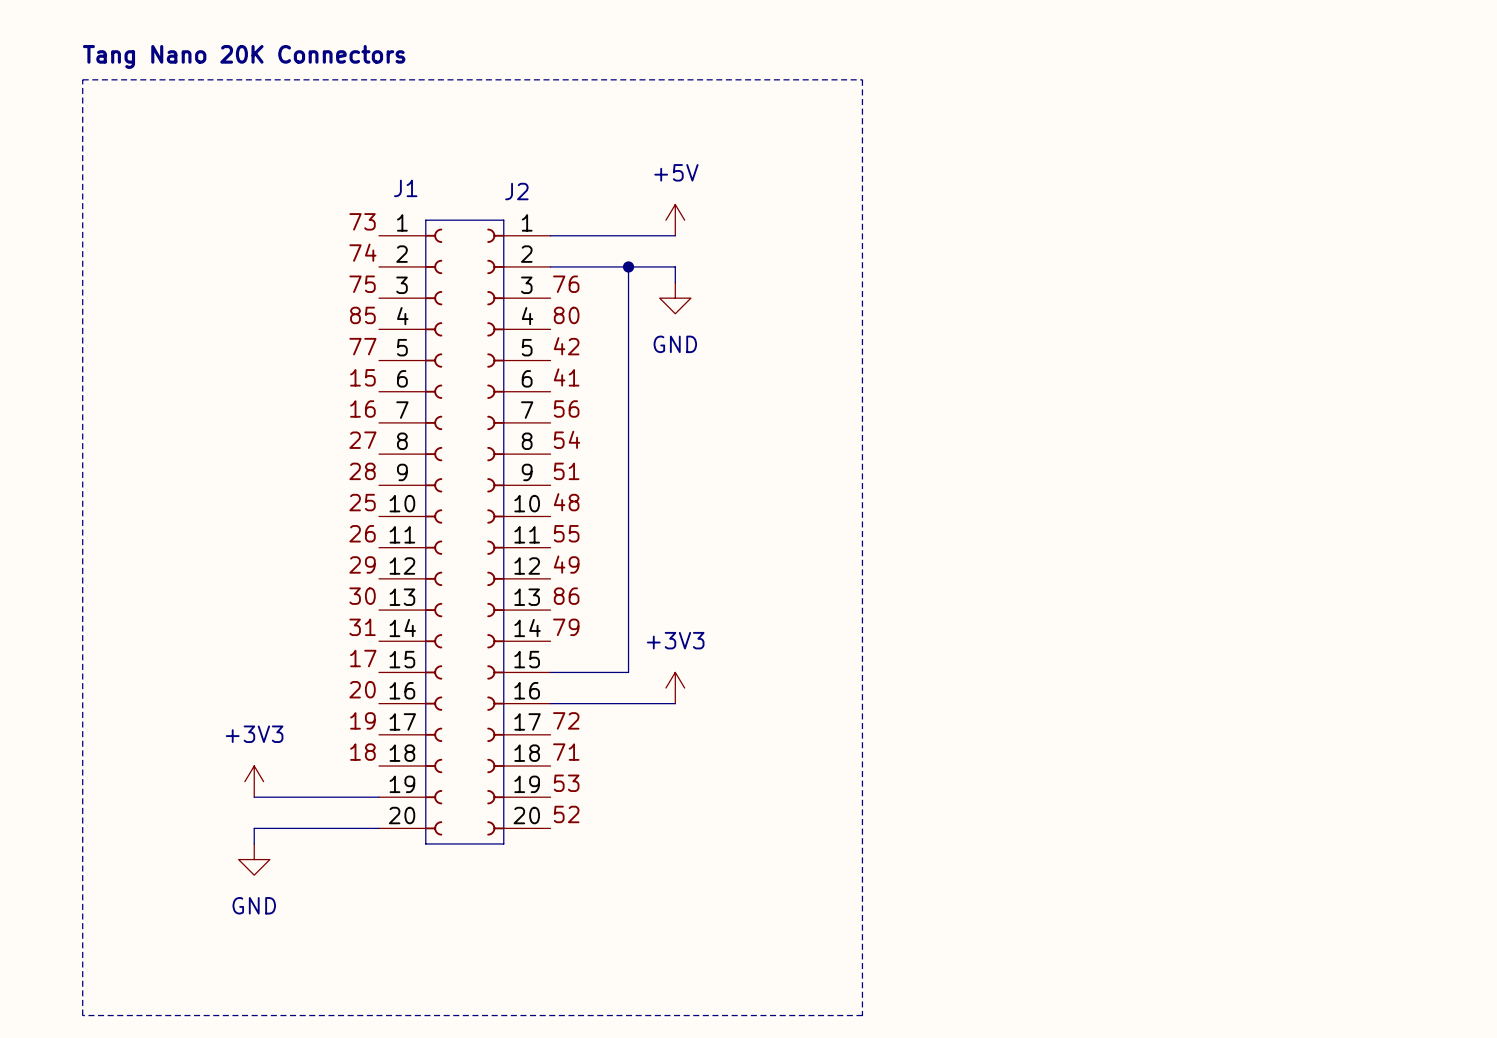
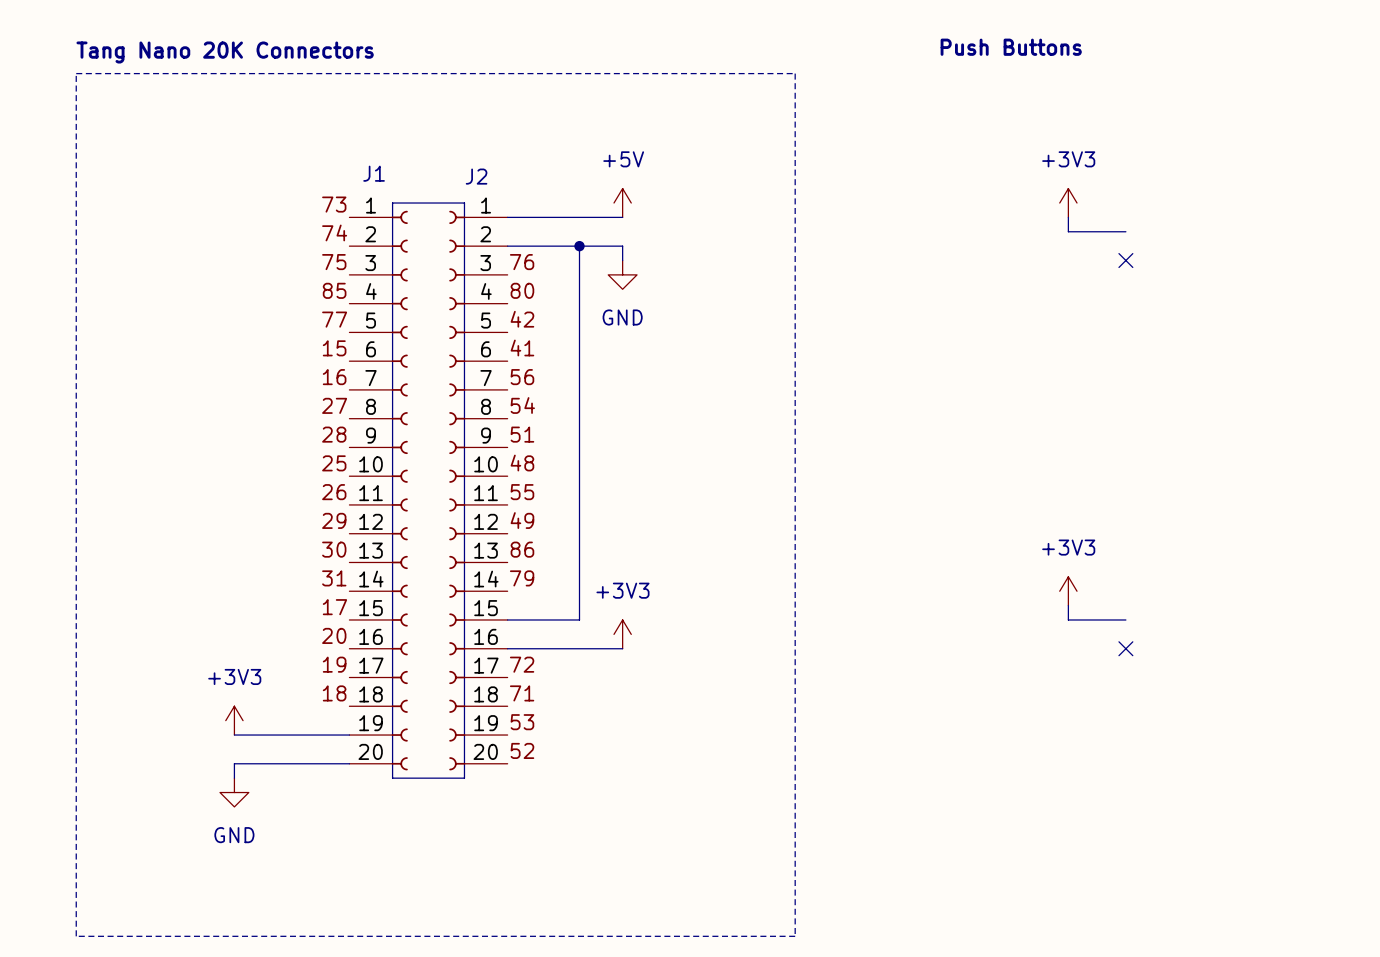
text: none -> Push Buttons (1011, 47)
power symbol: none -> +3V3 (1068, 203)
wire: none -> (1068, 217) (1068, 231) (1125, 231)
no-connect mark: none -> (1125, 260)
power symbol: none -> +3V3 (1068, 591)
wire: none -> (1068, 605) (1068, 619) (1125, 619)
no-connect mark: none -> (1125, 648)

